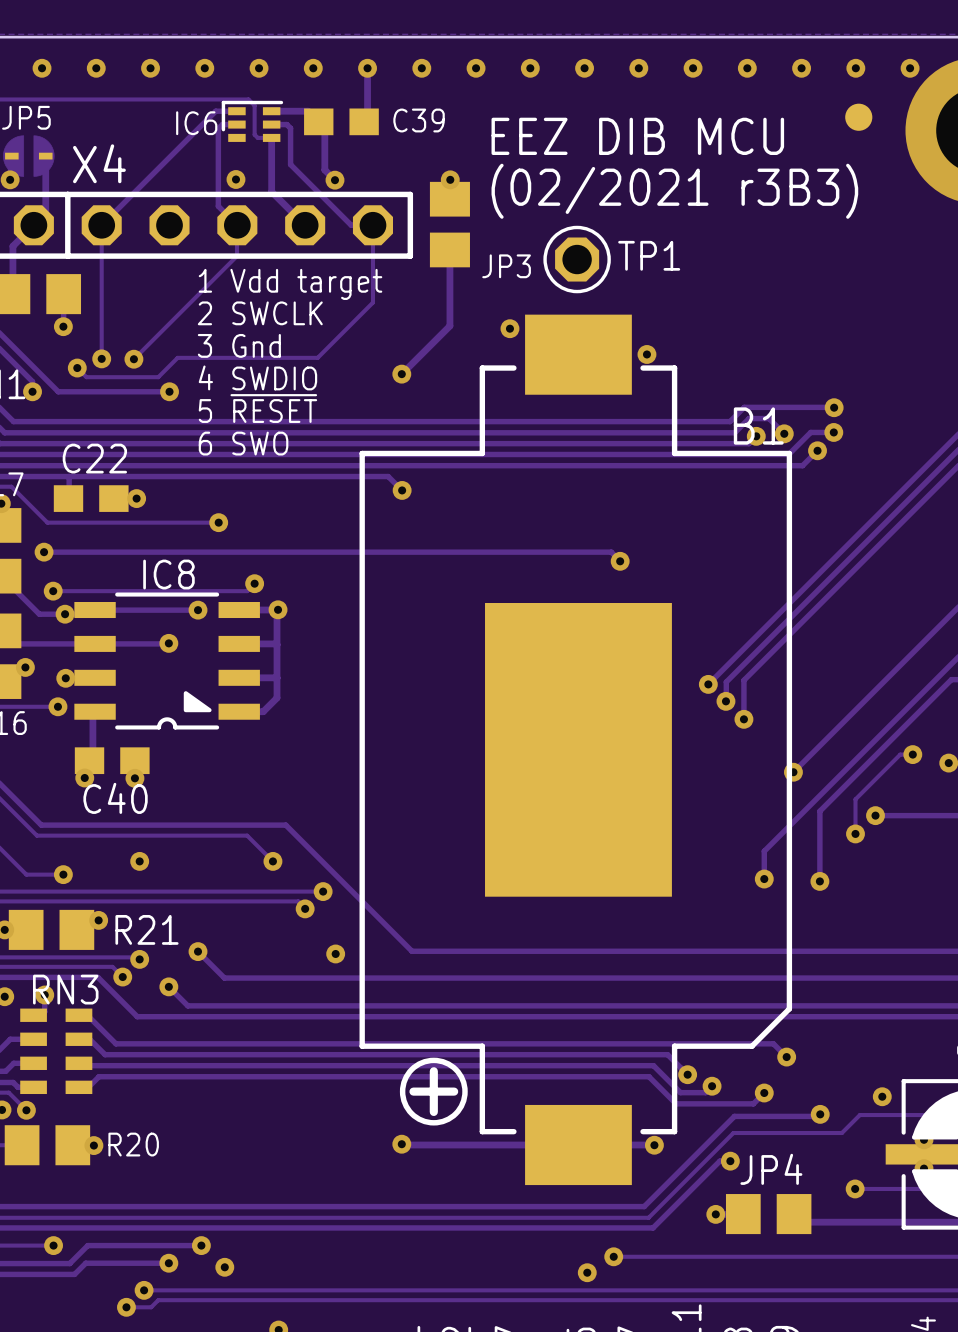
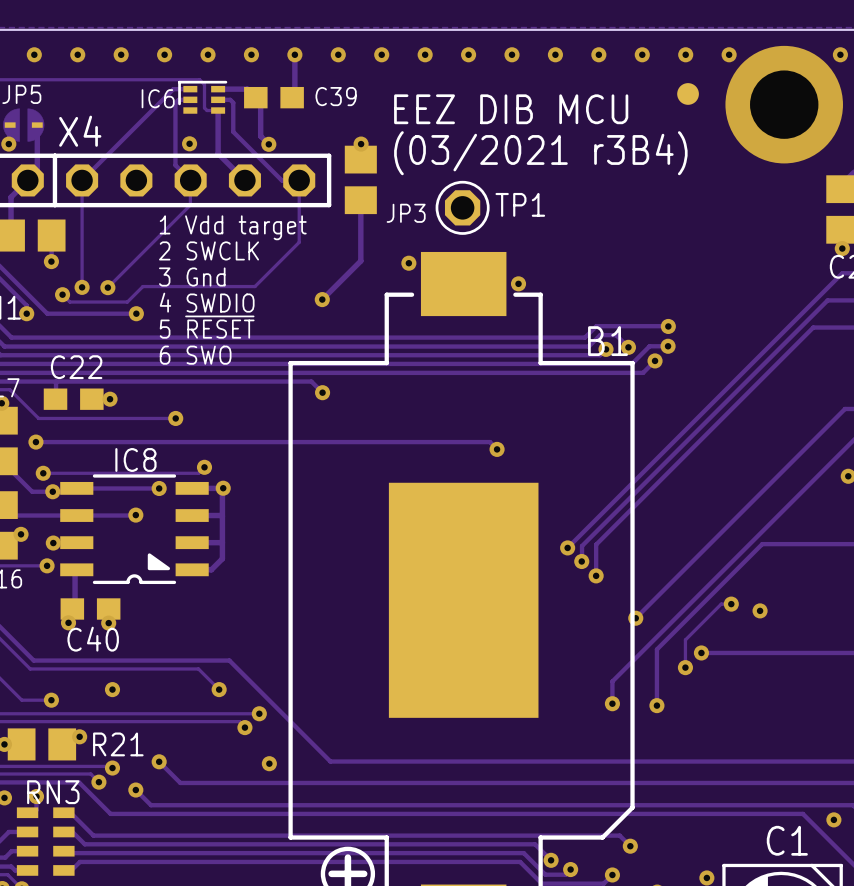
text: (02/2021 r3B3) (674, 191) -> (03/2021 r3B4) (540, 153)

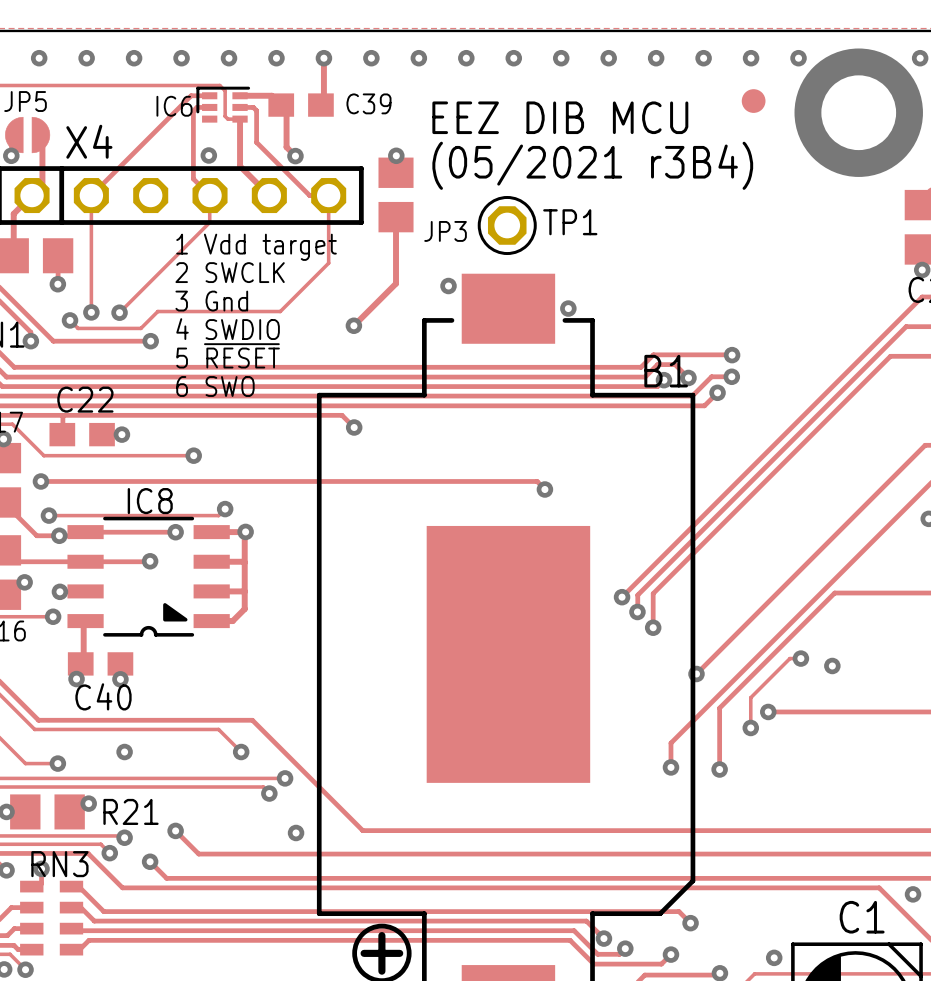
text: (03/2021 r3B4) (540, 153) -> (05/2021 r3B4) (592, 165)

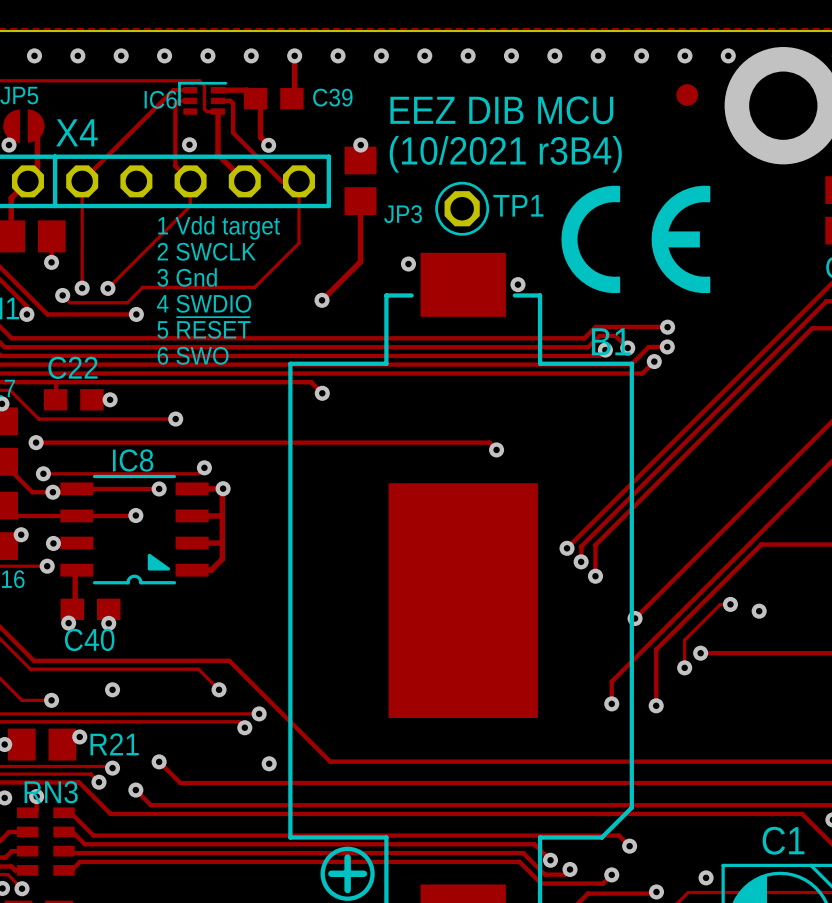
text: (05/2021 r3B4) (592, 165) -> (10/2021 r3B4) (505, 154)
drawing: none -> [561, 185, 711, 294]

